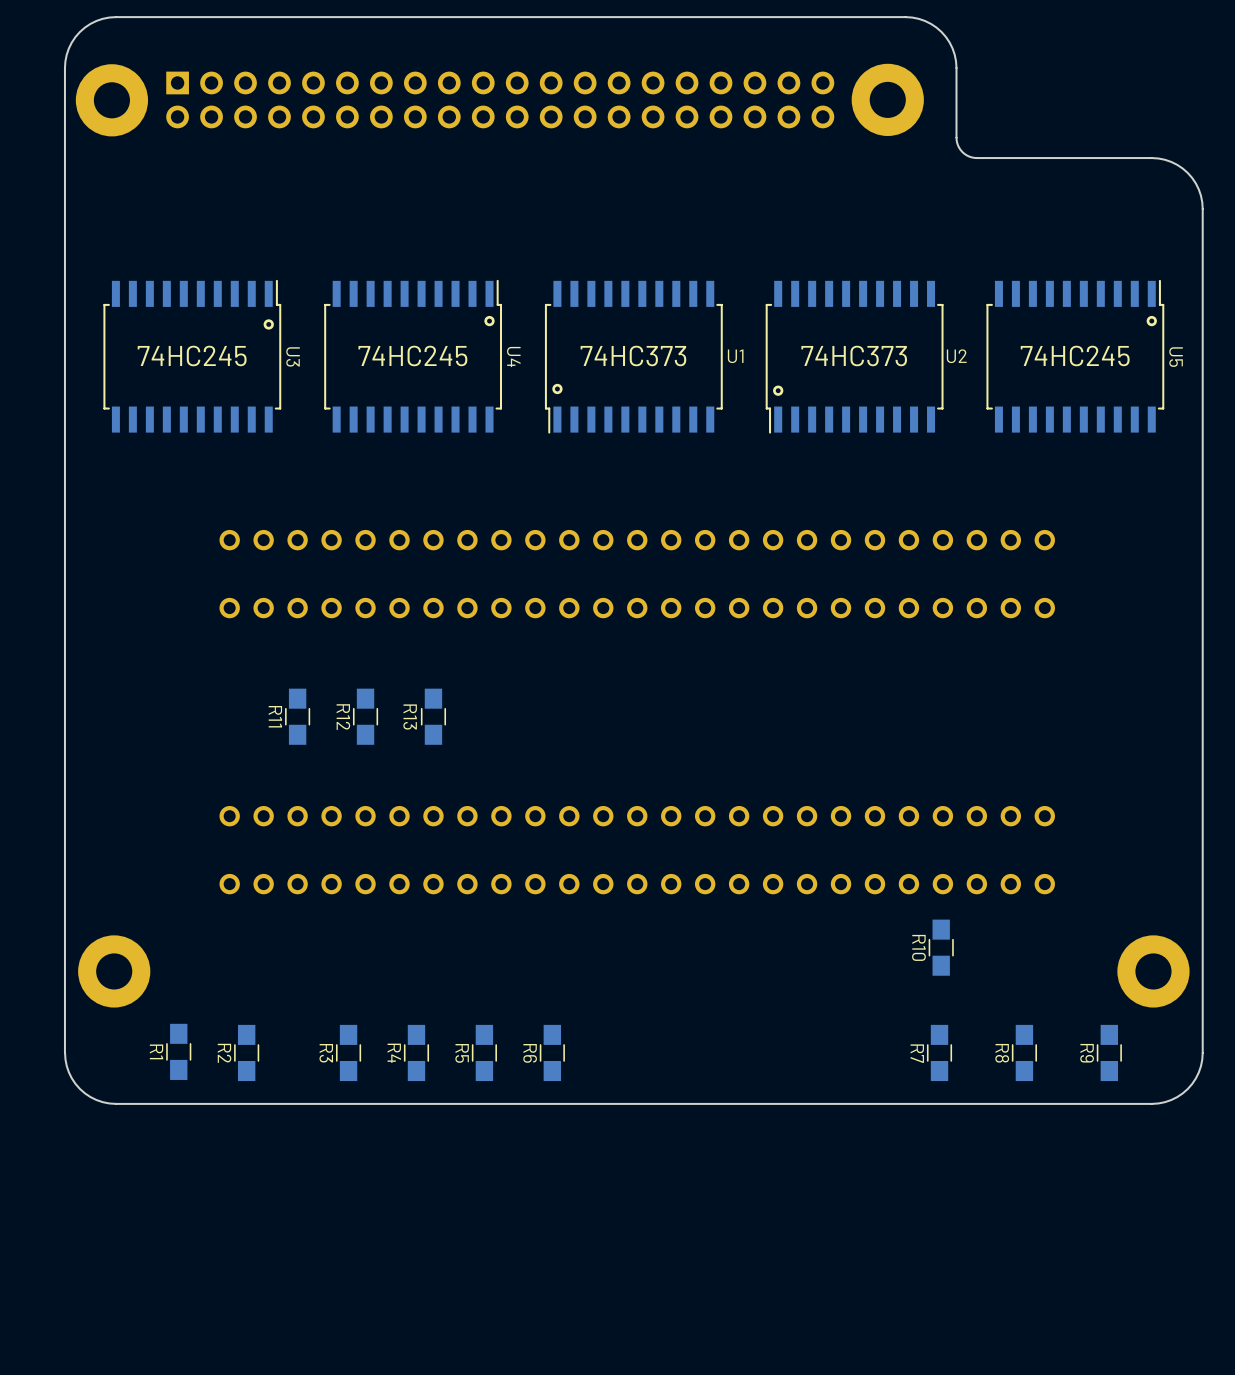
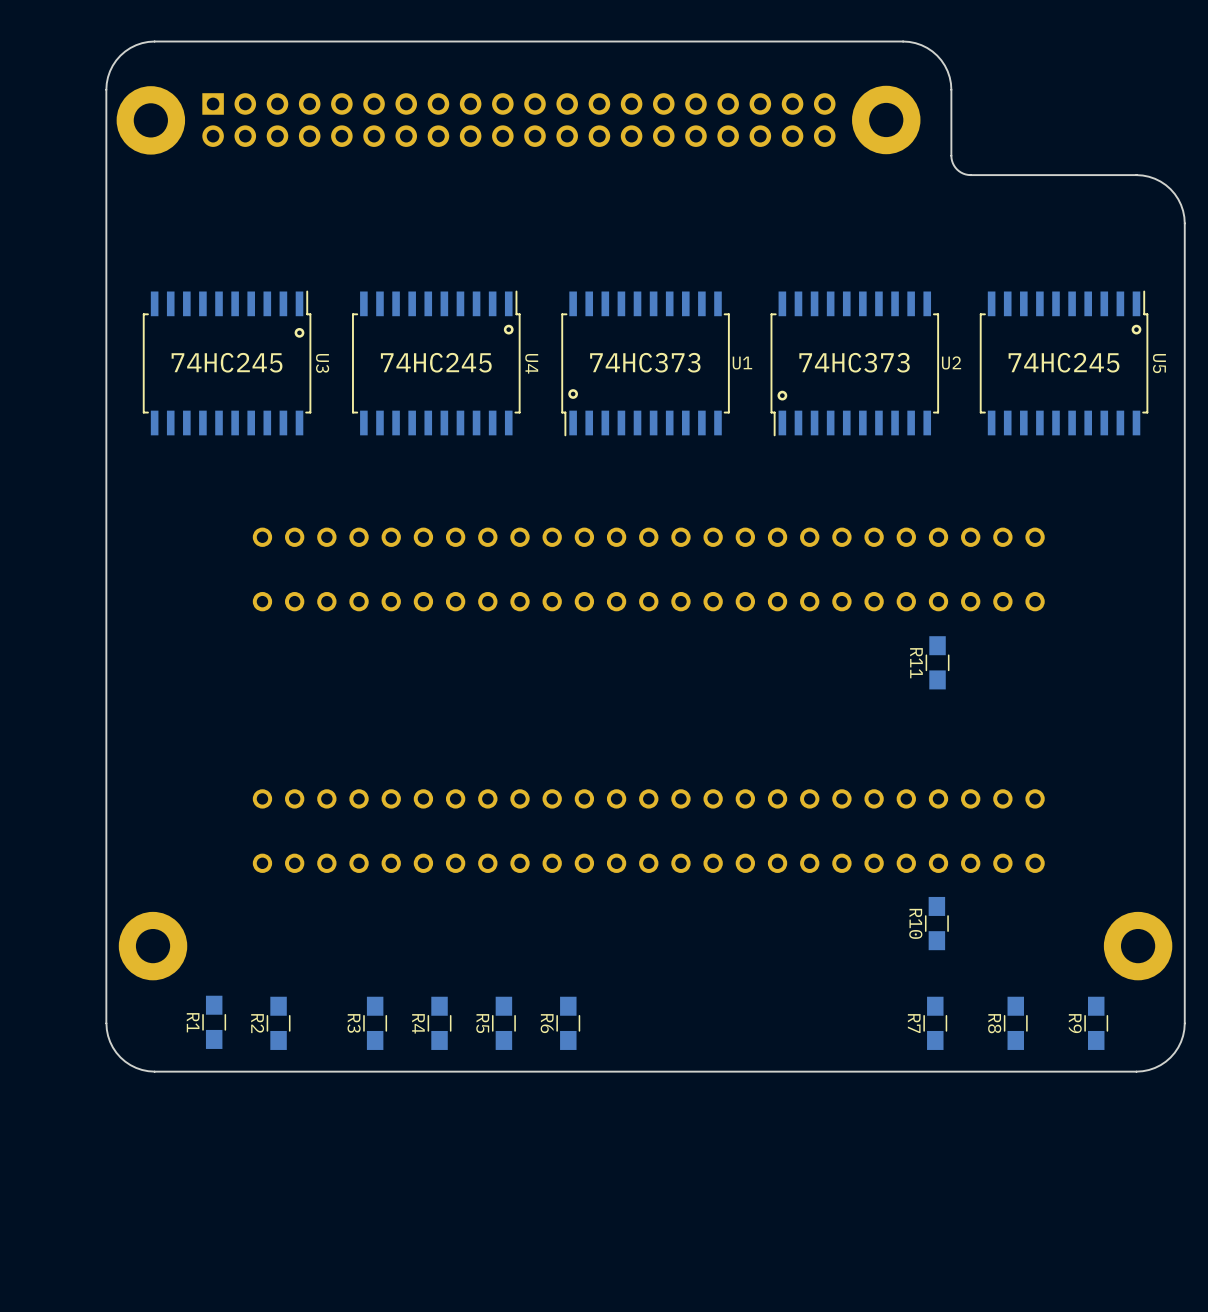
R11 position: (297, 716) -> (937, 662)
R12: (365, 716) -> none
R13: (433, 716) -> none

